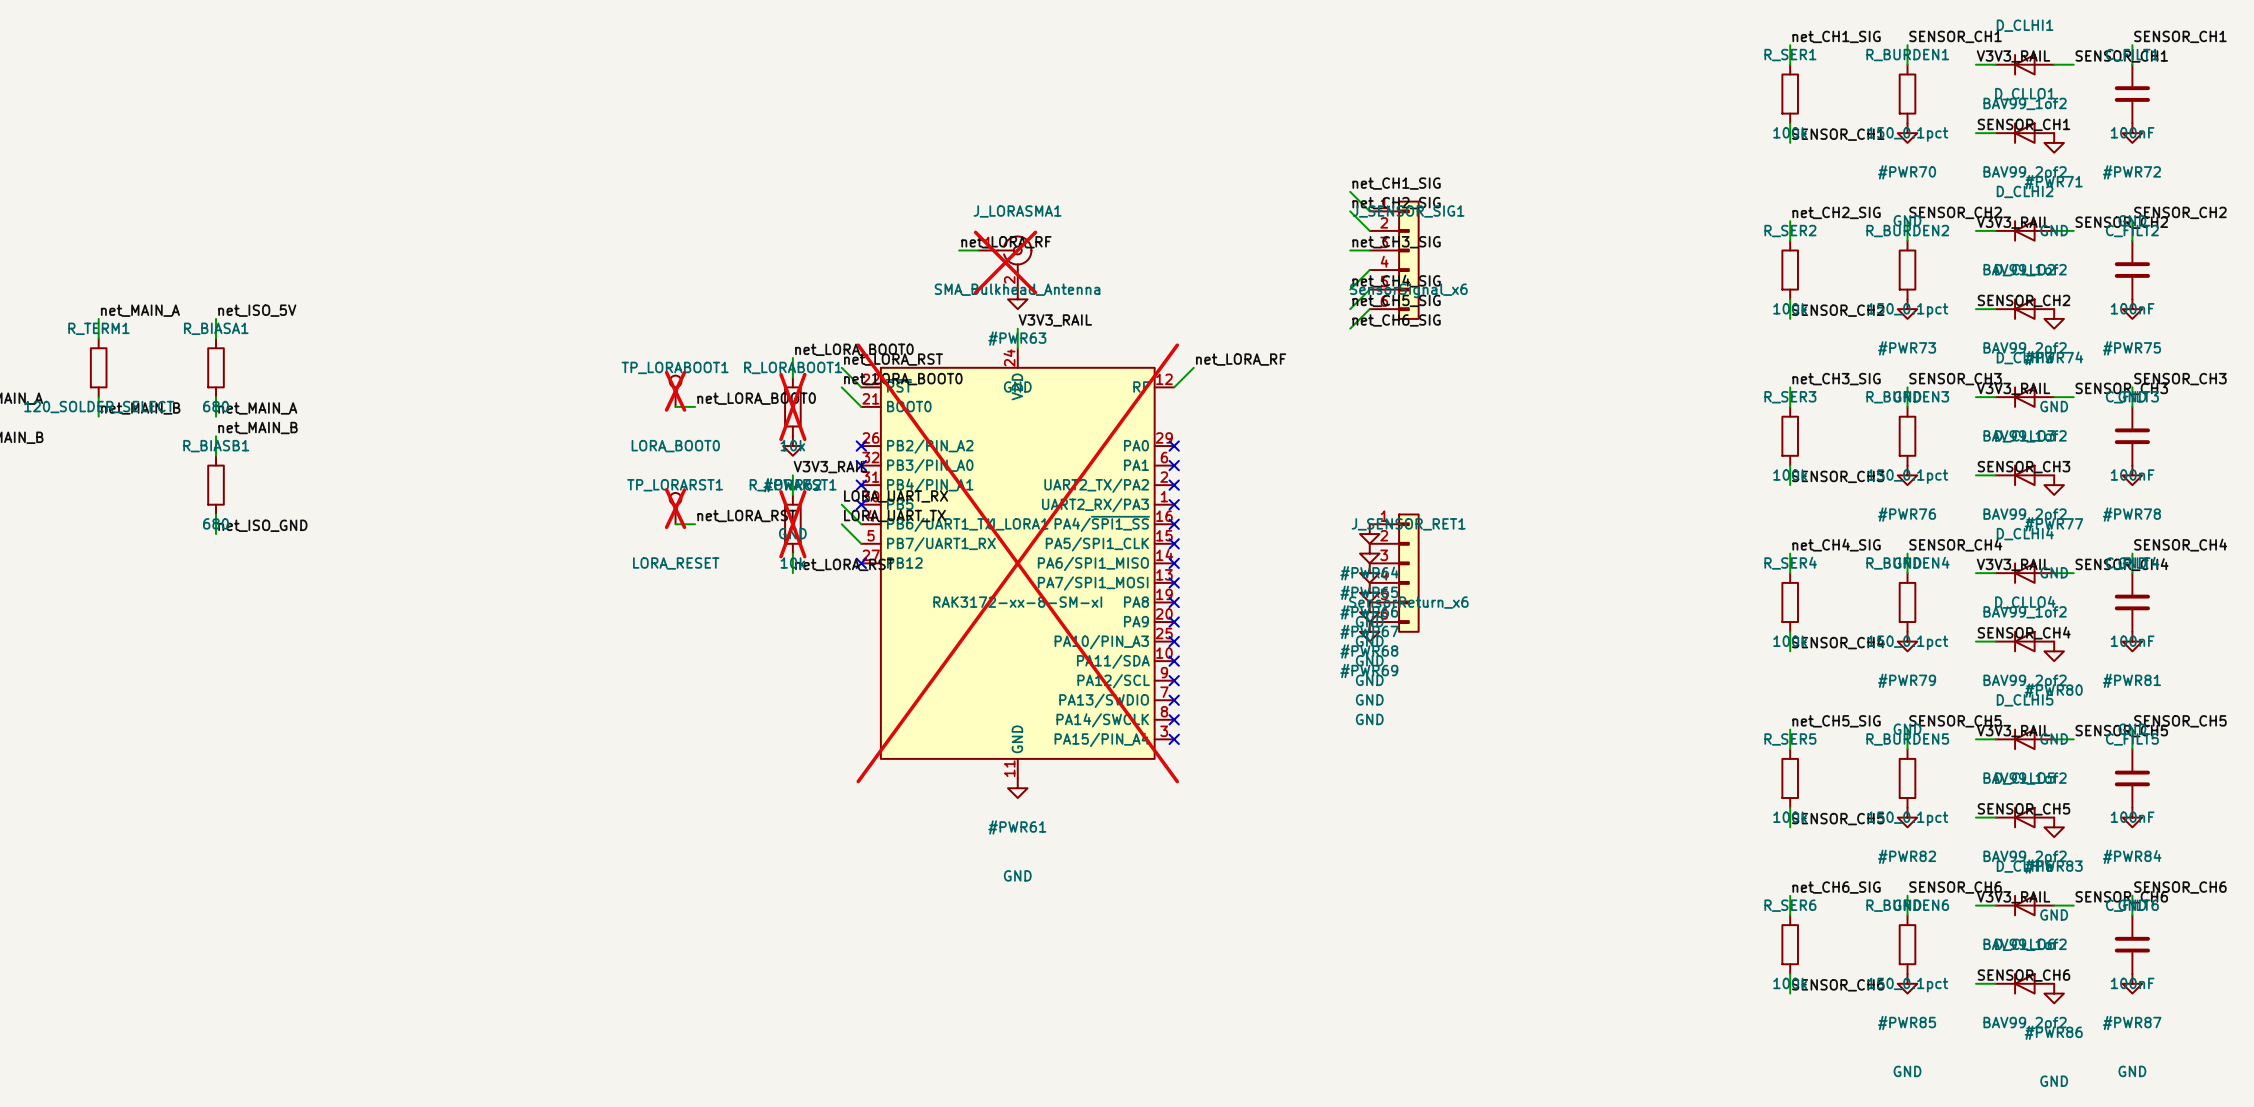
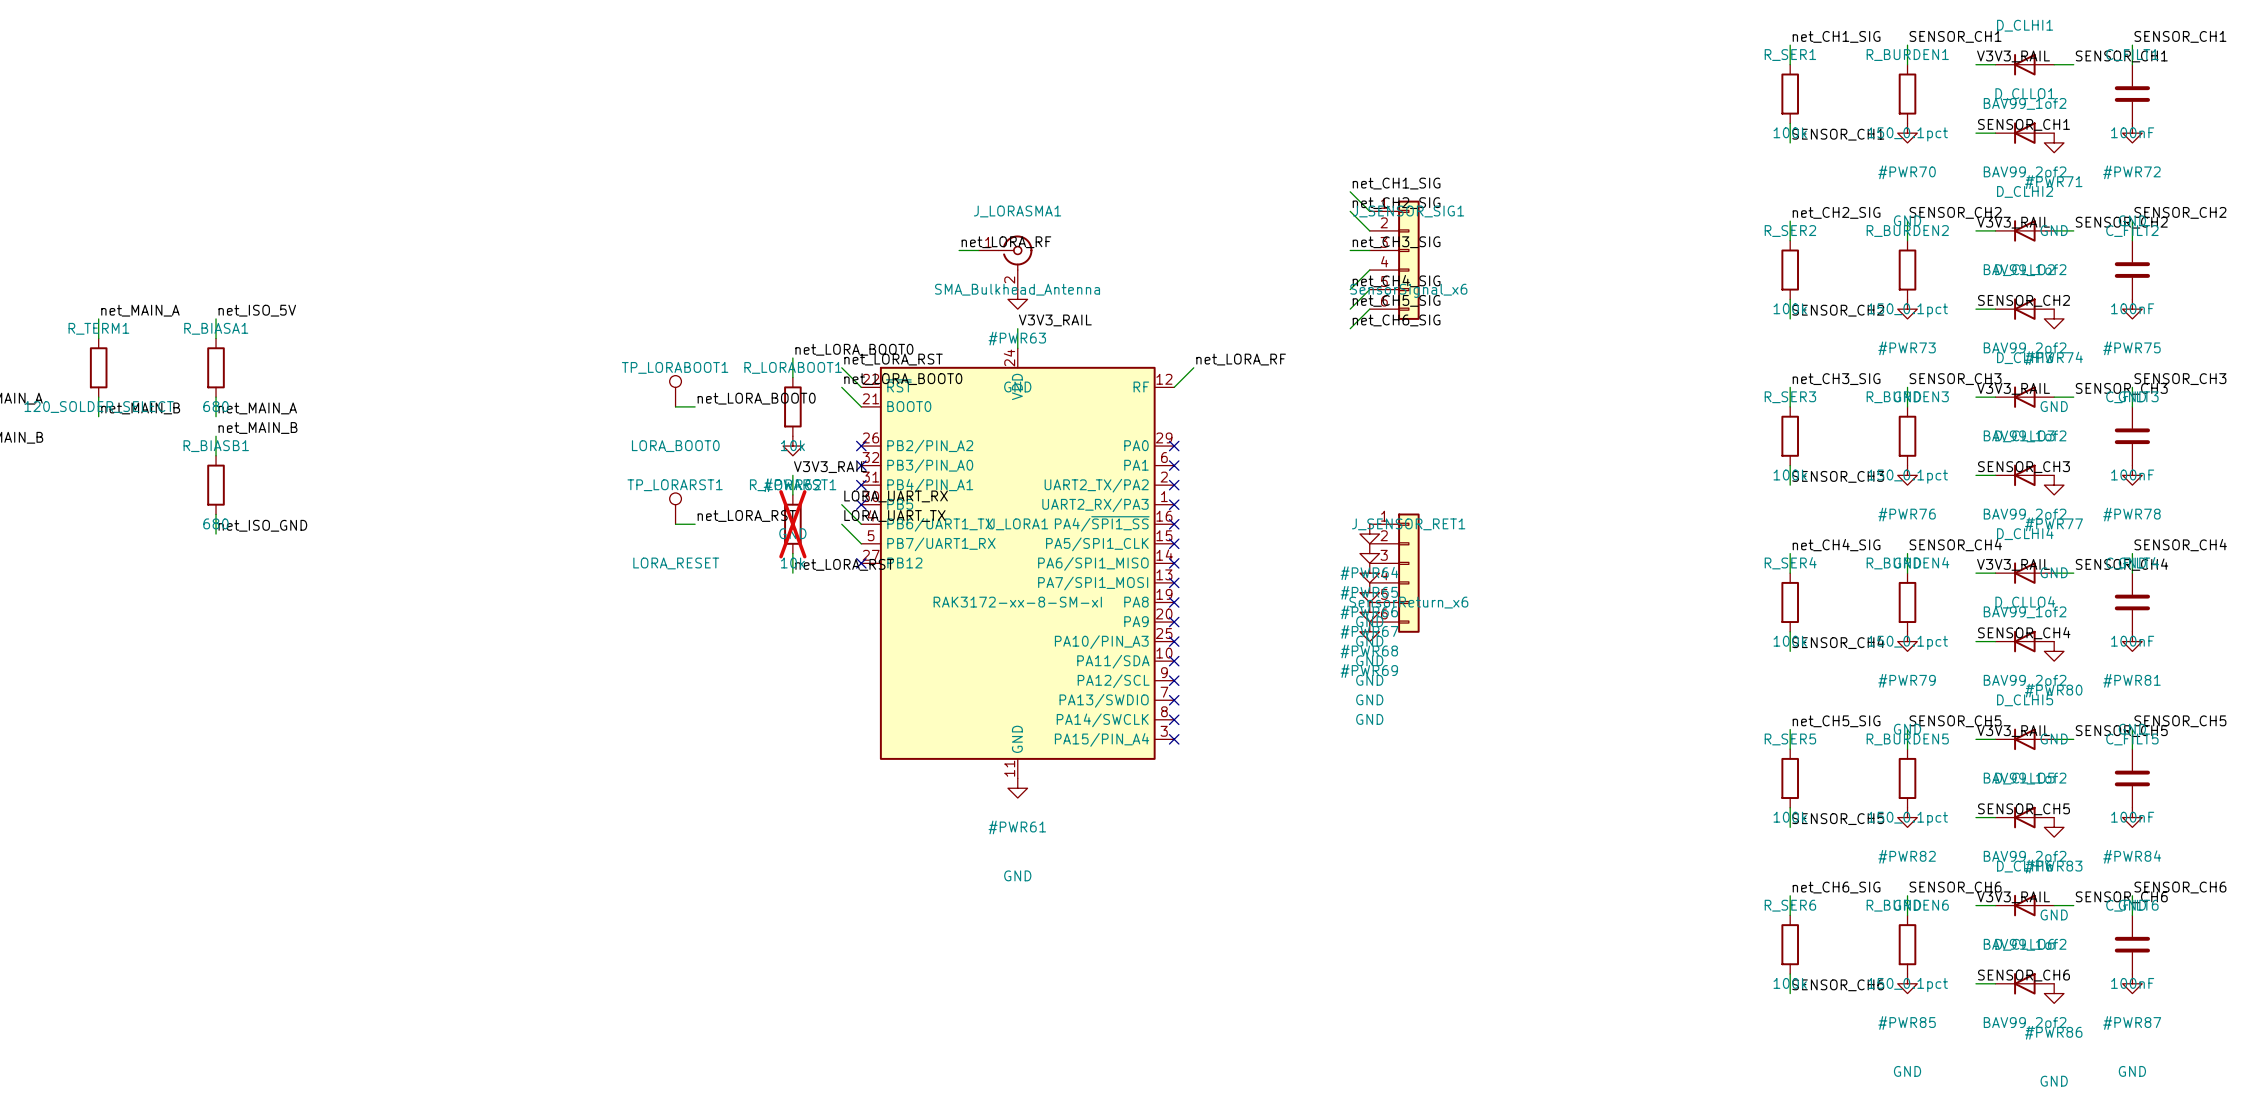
J_LORASMA1 do-not-place cross: (1005, 262) -> none
TP_LORABOOT1 do-not-place cross: (675, 391) -> none
R_LORABOOT1 do-not-place cross: (792, 406) -> none
TP_LORARST1 do-not-place cross: (675, 508) -> none
U_LORA1 do-not-place cross: (1017, 563) -> none

